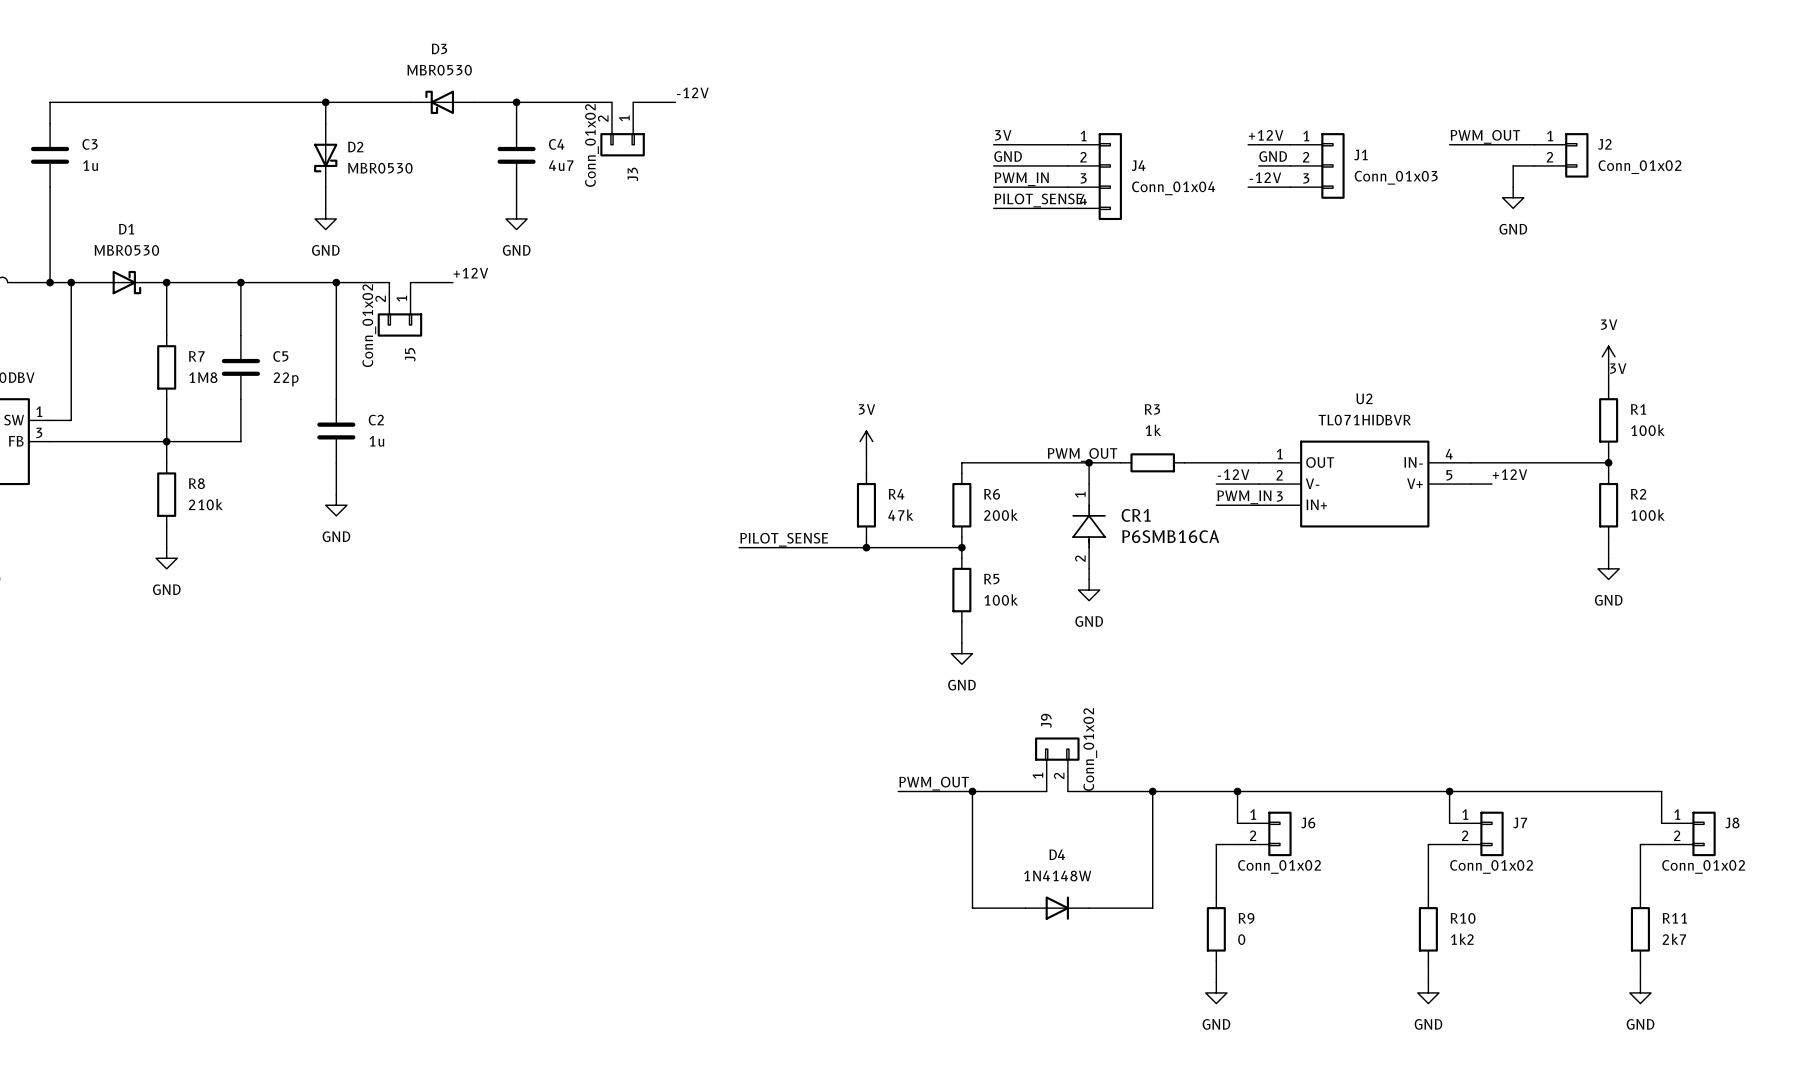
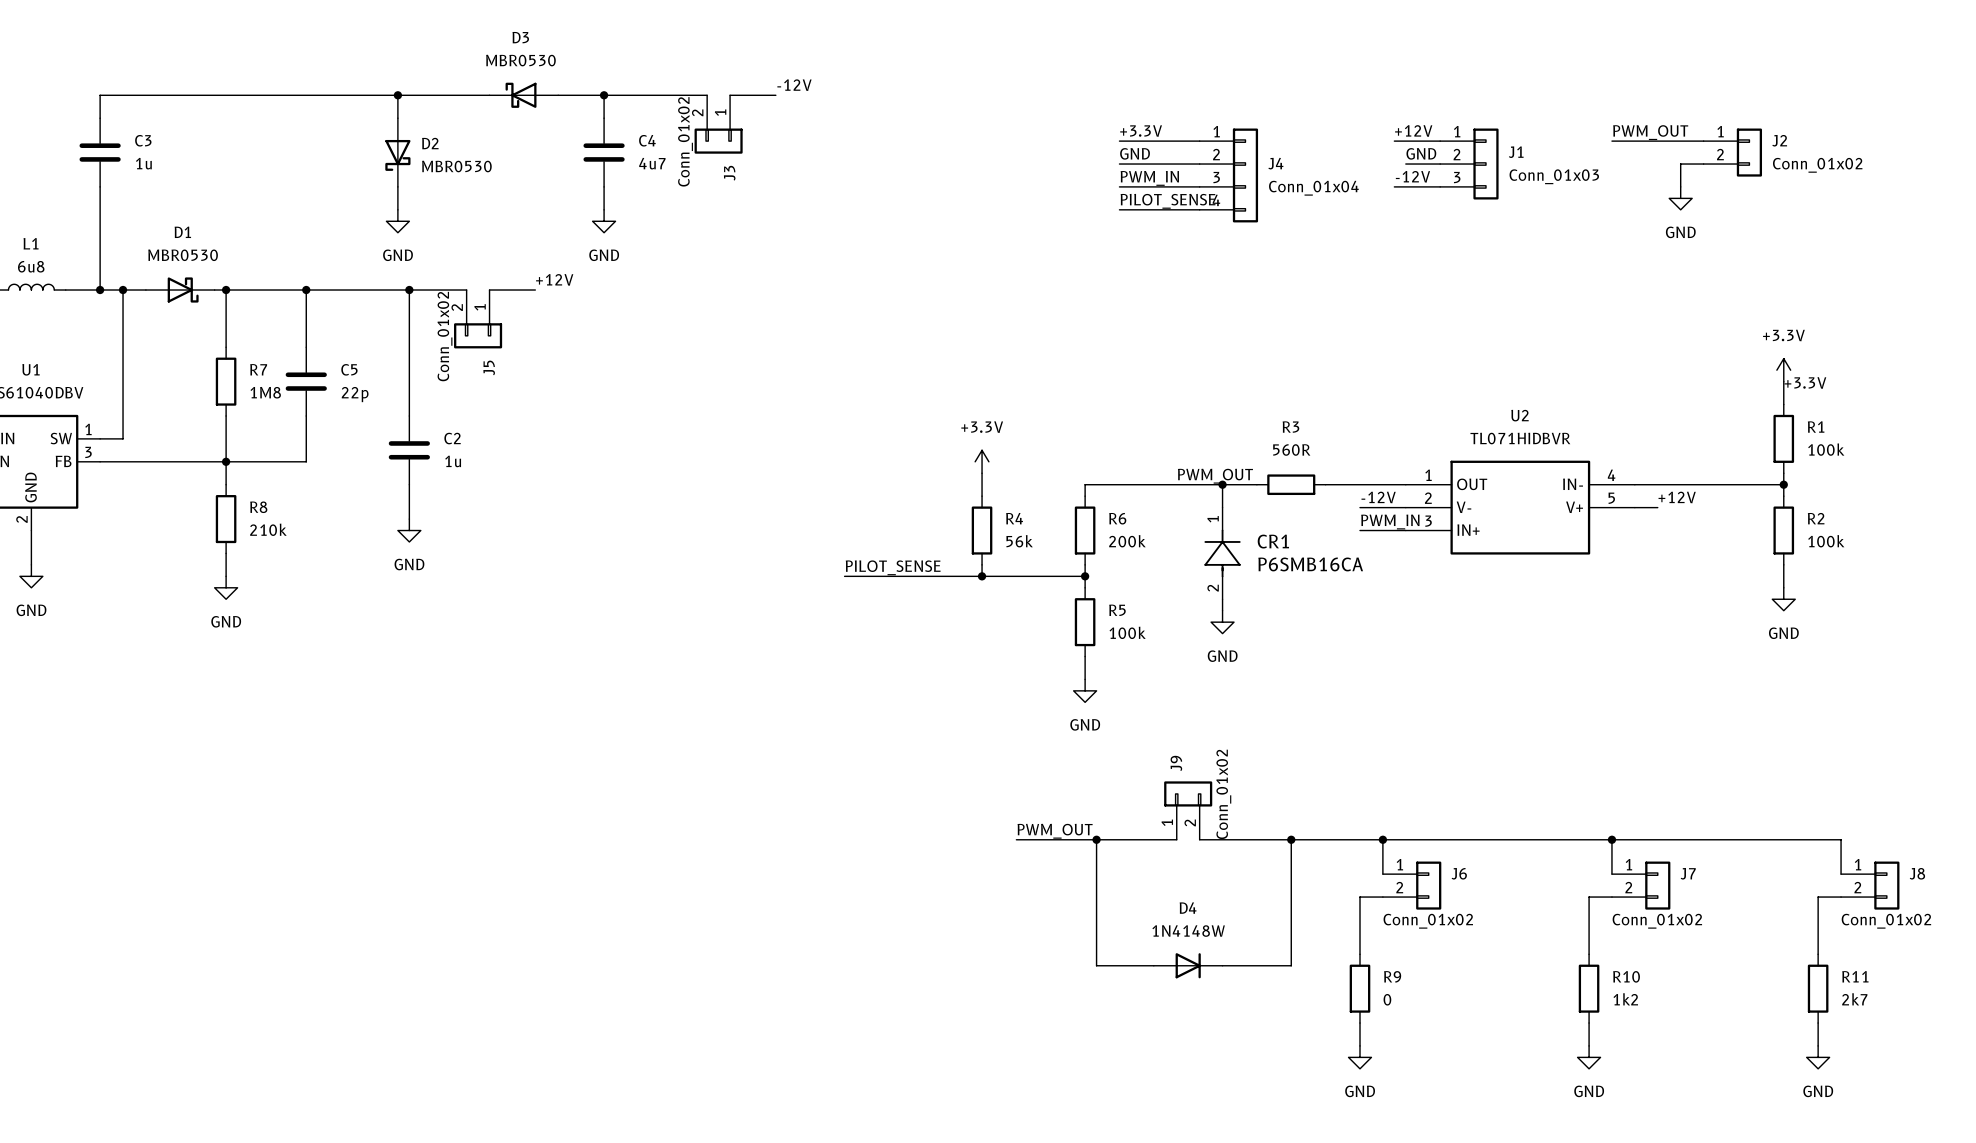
label: 3V (1003, 135) -> +3.3V (1141, 130)
power symbol: 3V (1608, 356) -> +3.3V (1783, 370)
label: 3V (1618, 368) -> +3.3V (1805, 382)
R3 value: 1k (1153, 430) -> 560R (1291, 450)
power symbol: 3V (866, 441) -> +3.3V (982, 461)
R4 value: 47k (900, 515) -> 56k (1019, 541)

